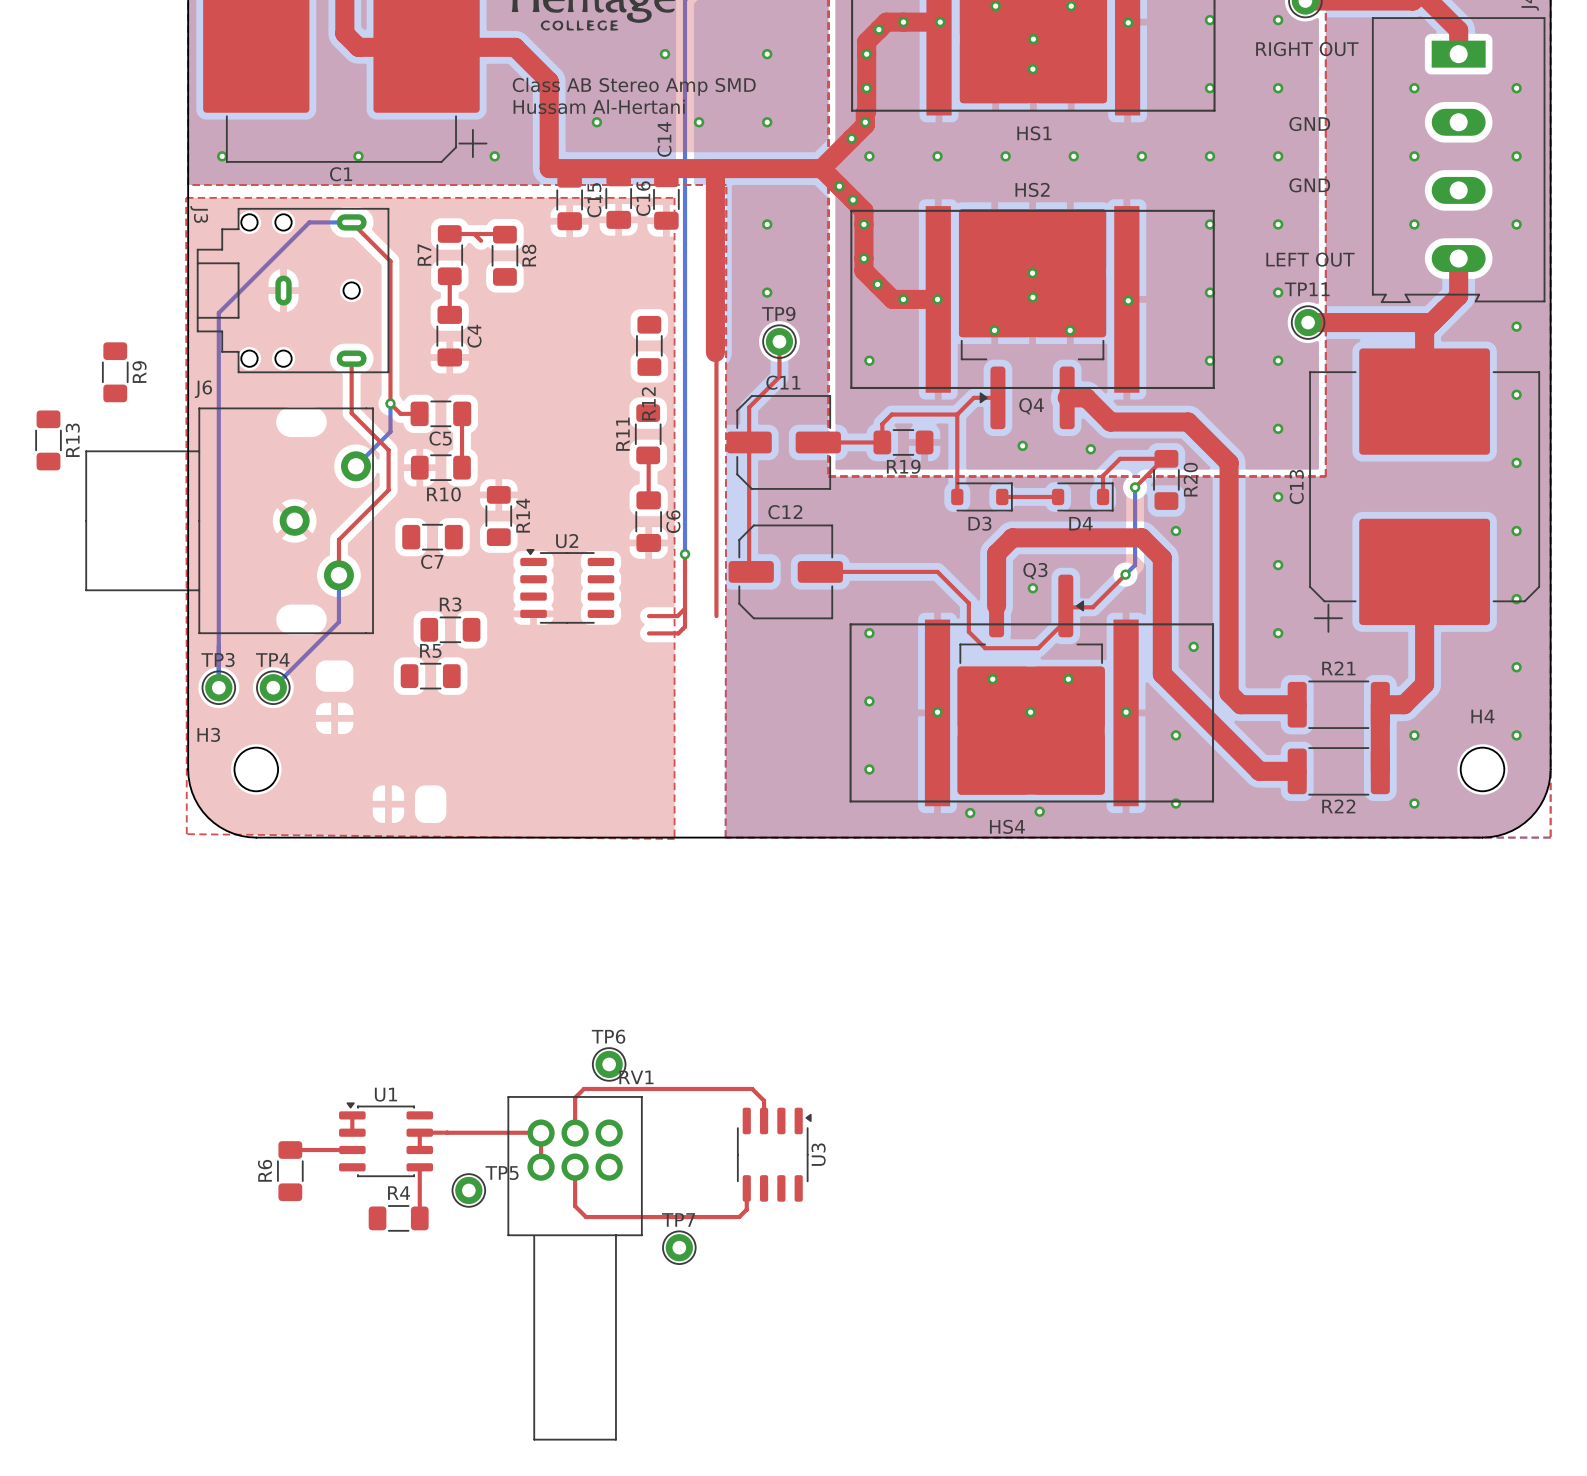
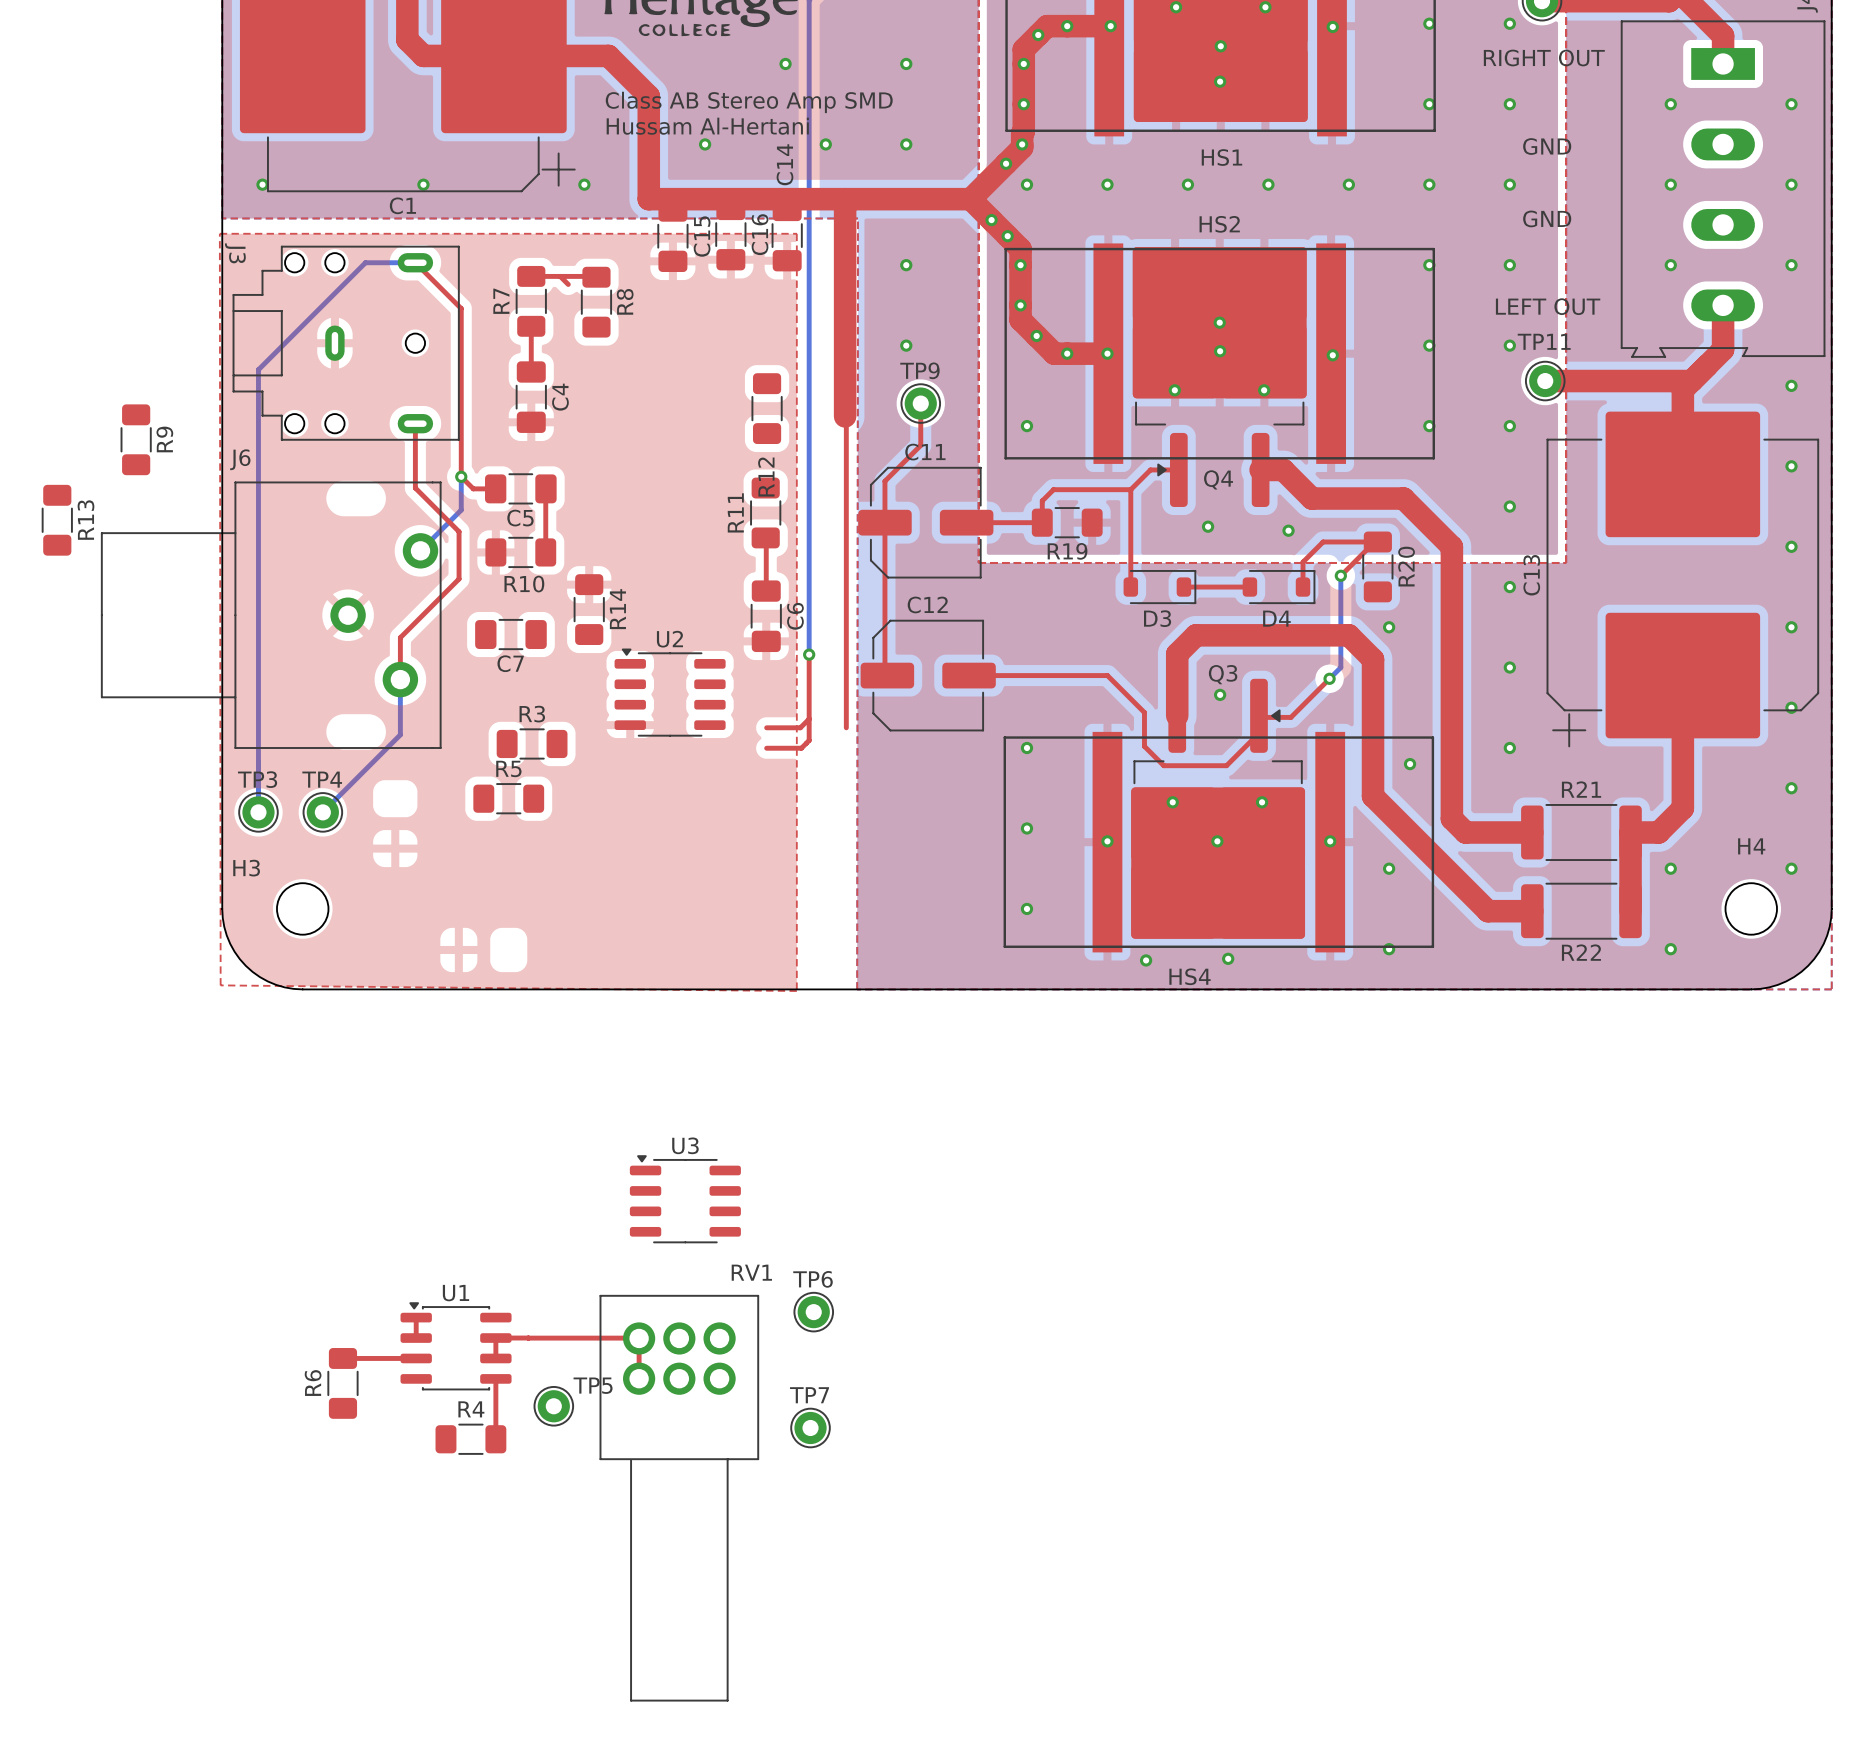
TP6 position: (609, 1064) -> (813, 1312)
top track: (764, 1120) (764, 1100) (752, 1088) (583, 1088) (575, 1097) (575, 1133) -> none
U3 rotation: 0° (774, 1154) -> 90° counterclockwise (685, 1199)
U3 position: (774, 1154) -> (685, 1199)
top track: (575, 1167) (575, 1206) (586, 1217) (739, 1217) (746, 1209) (746, 1188) -> none
TP7 position: (679, 1247) -> (810, 1428)

